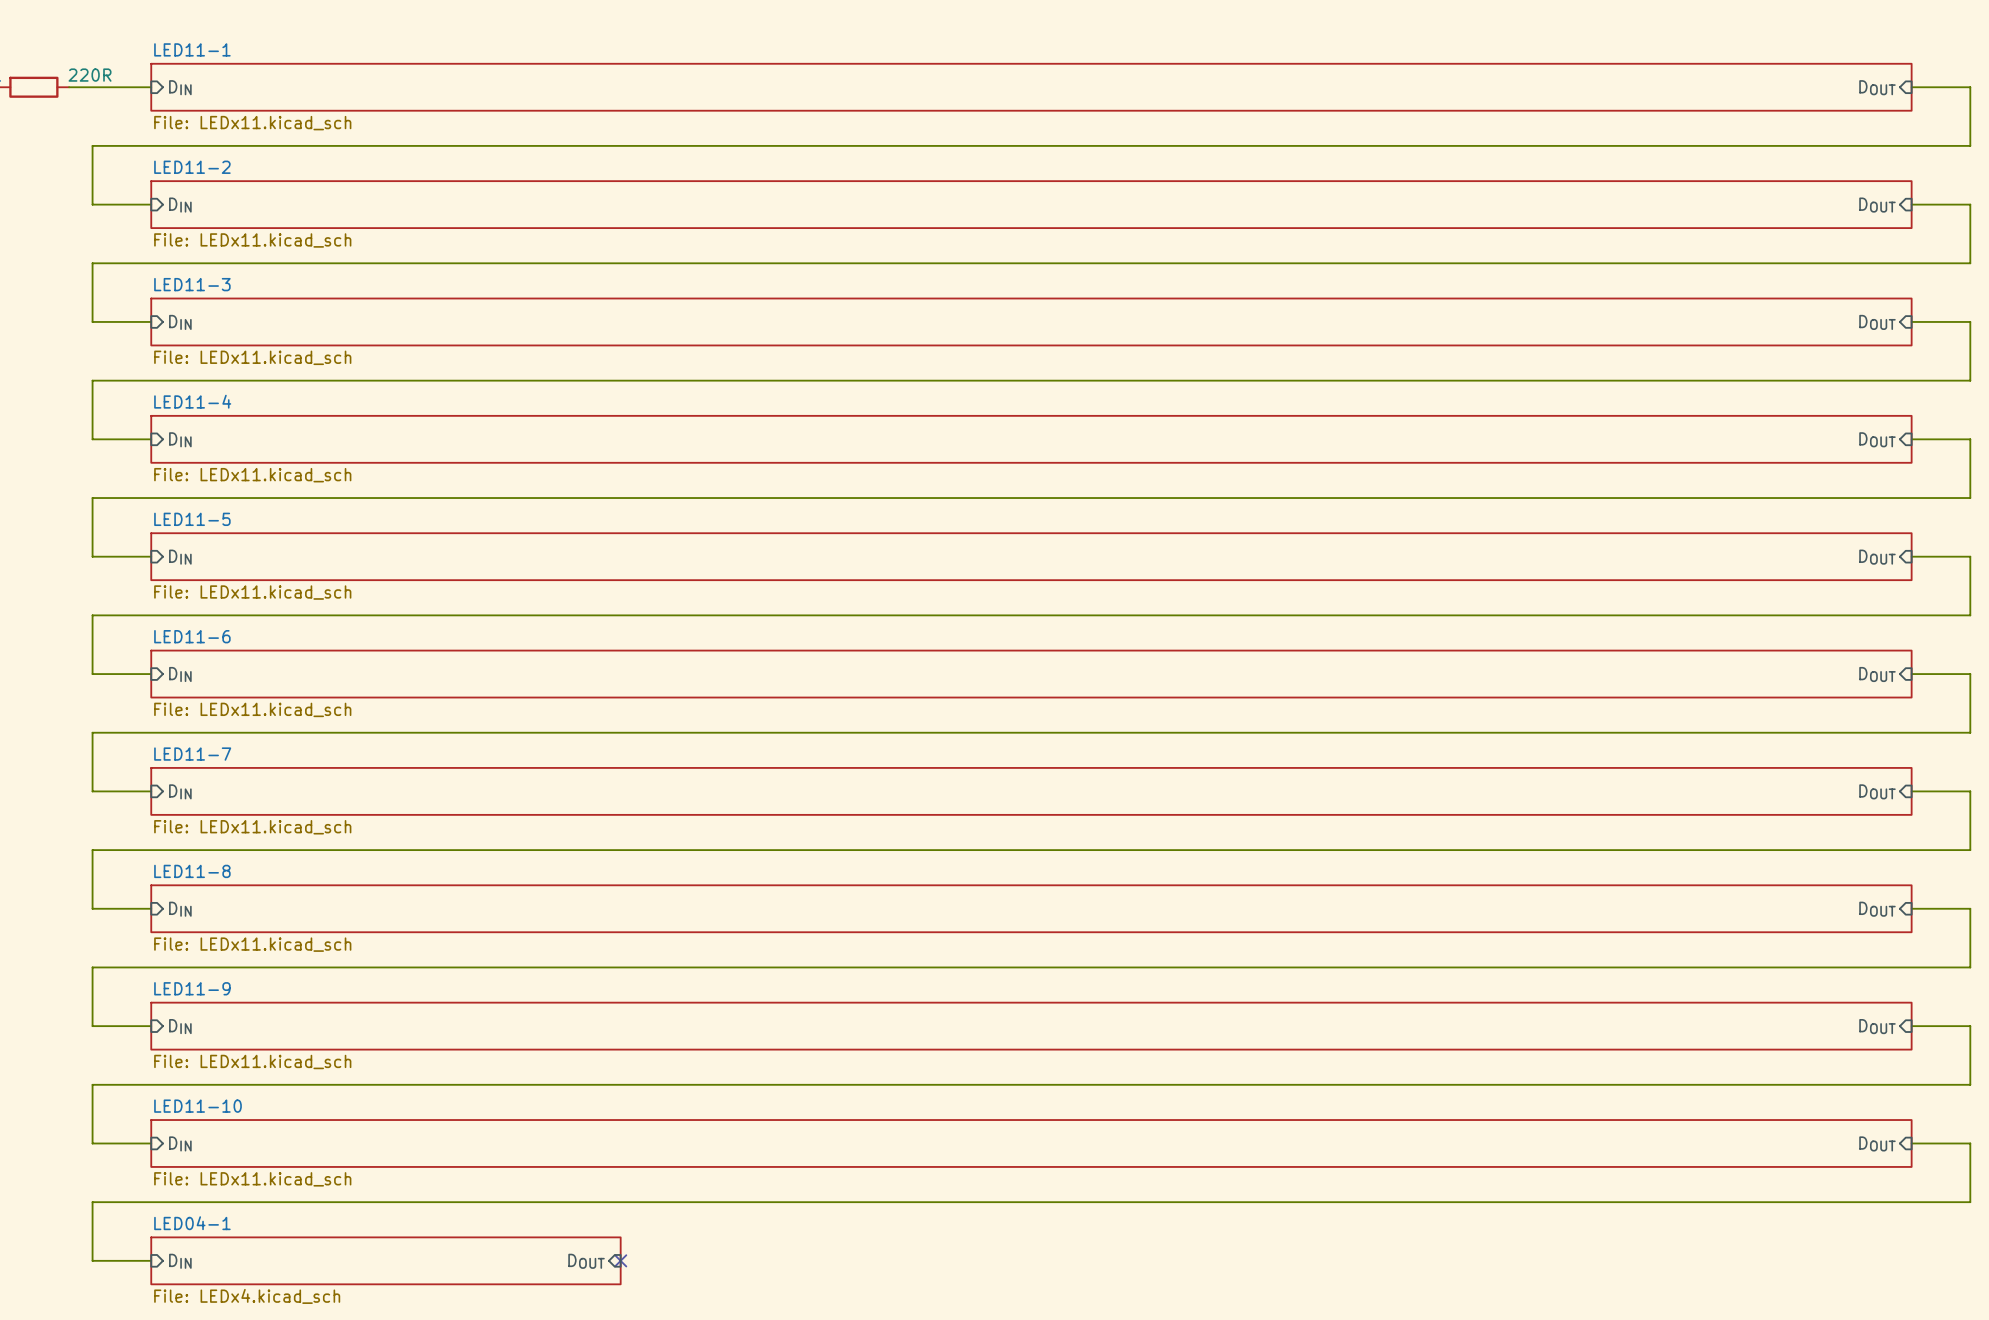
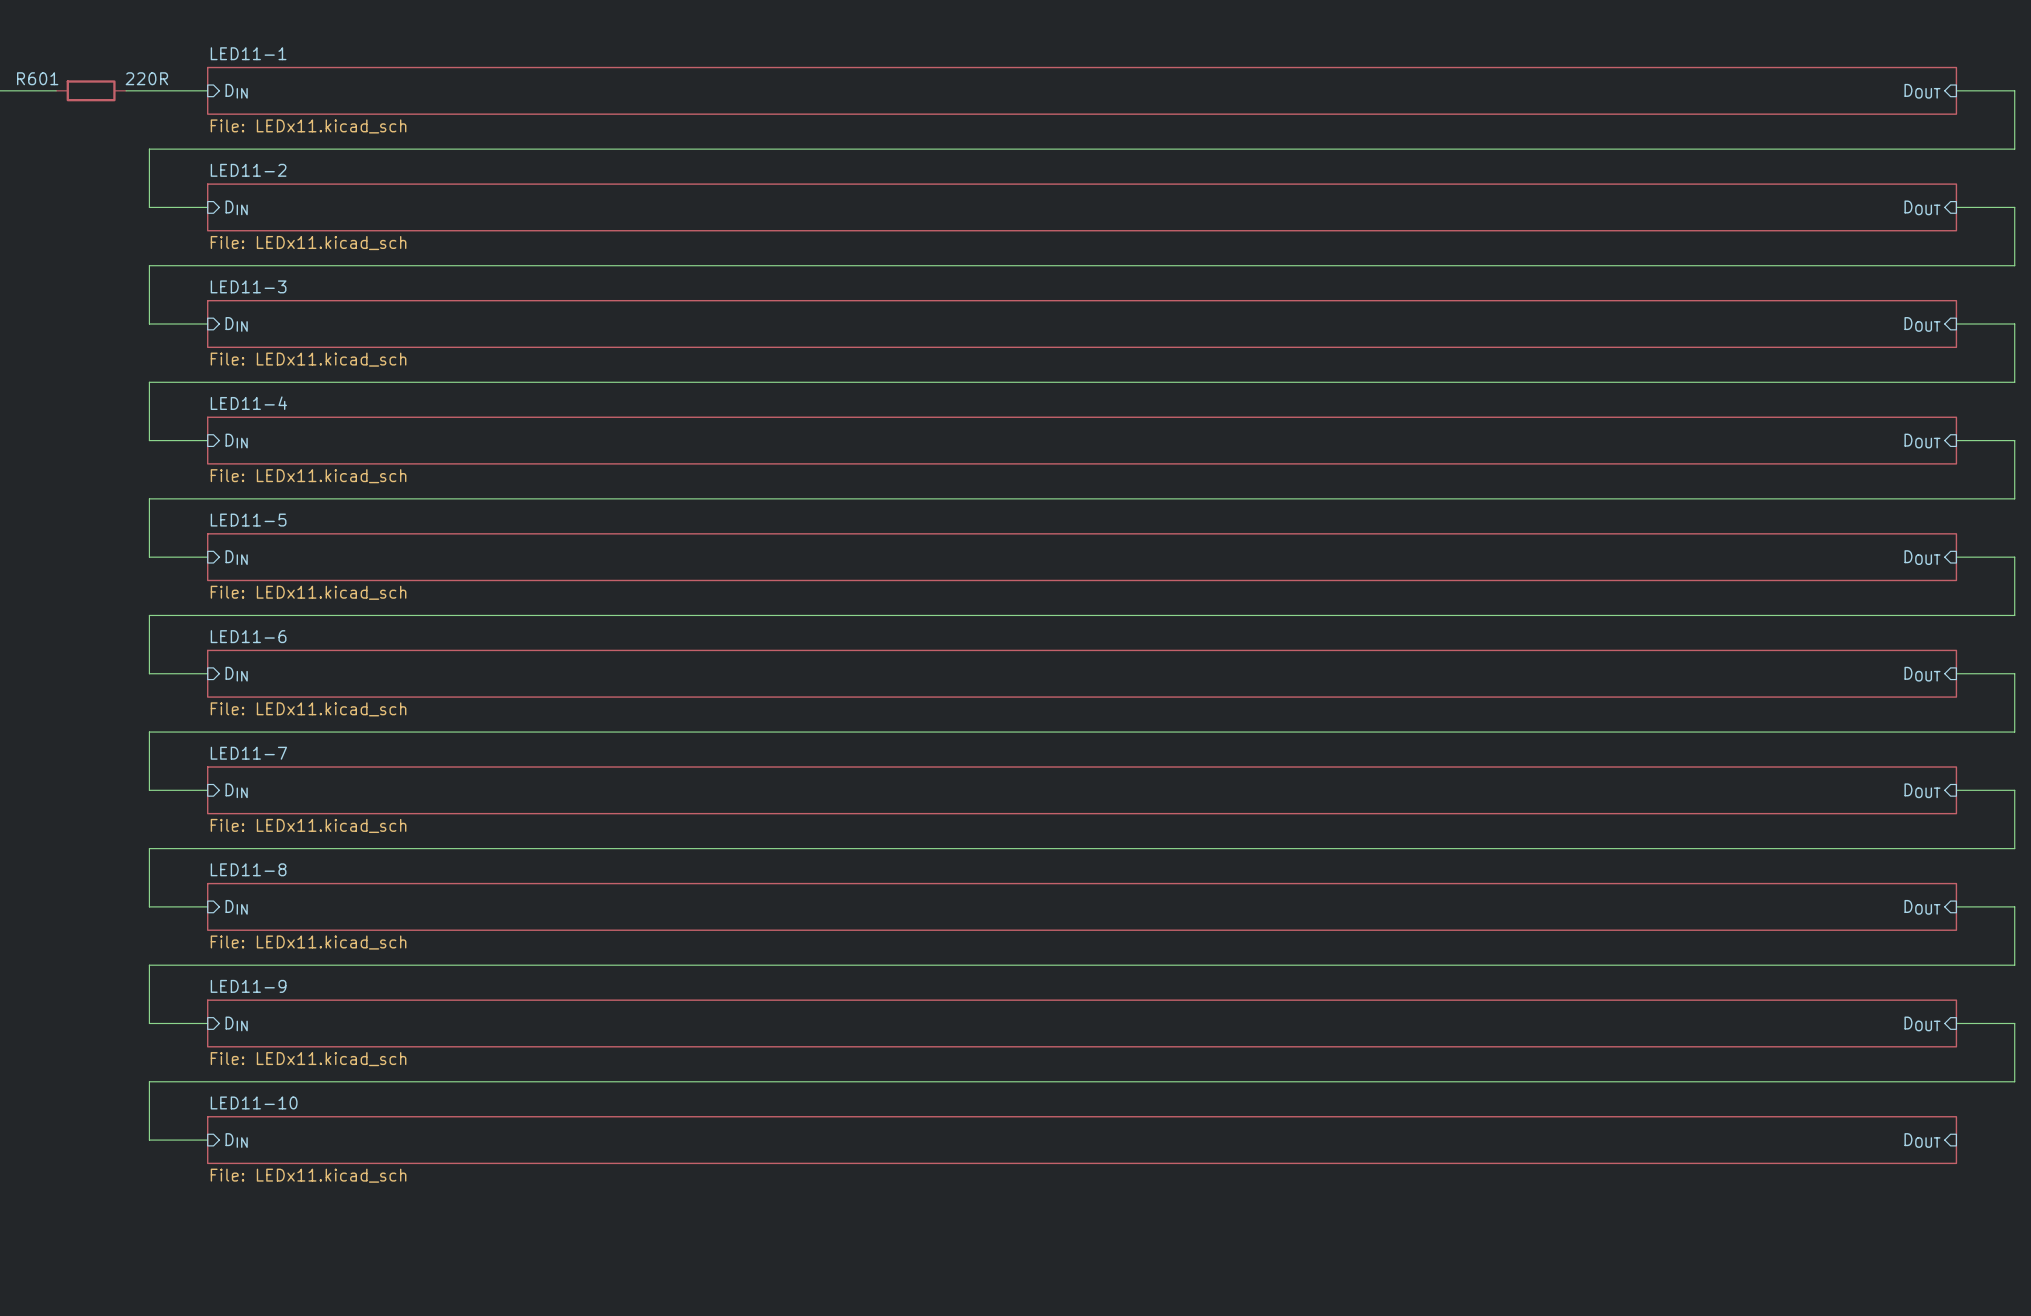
wire: (1911, 1143) (1970, 1143) (1970, 1202) (92, 1202) (92, 1260) (151, 1260) -> none
sheet LED04-1: File: LEDx4.kicad_sch (385, 1260) -> none
no-connect mark: (620, 1260) -> none
sheet pin: DIN (180, 1261) -> none
sheet pin: DOUT (586, 1261) -> none

